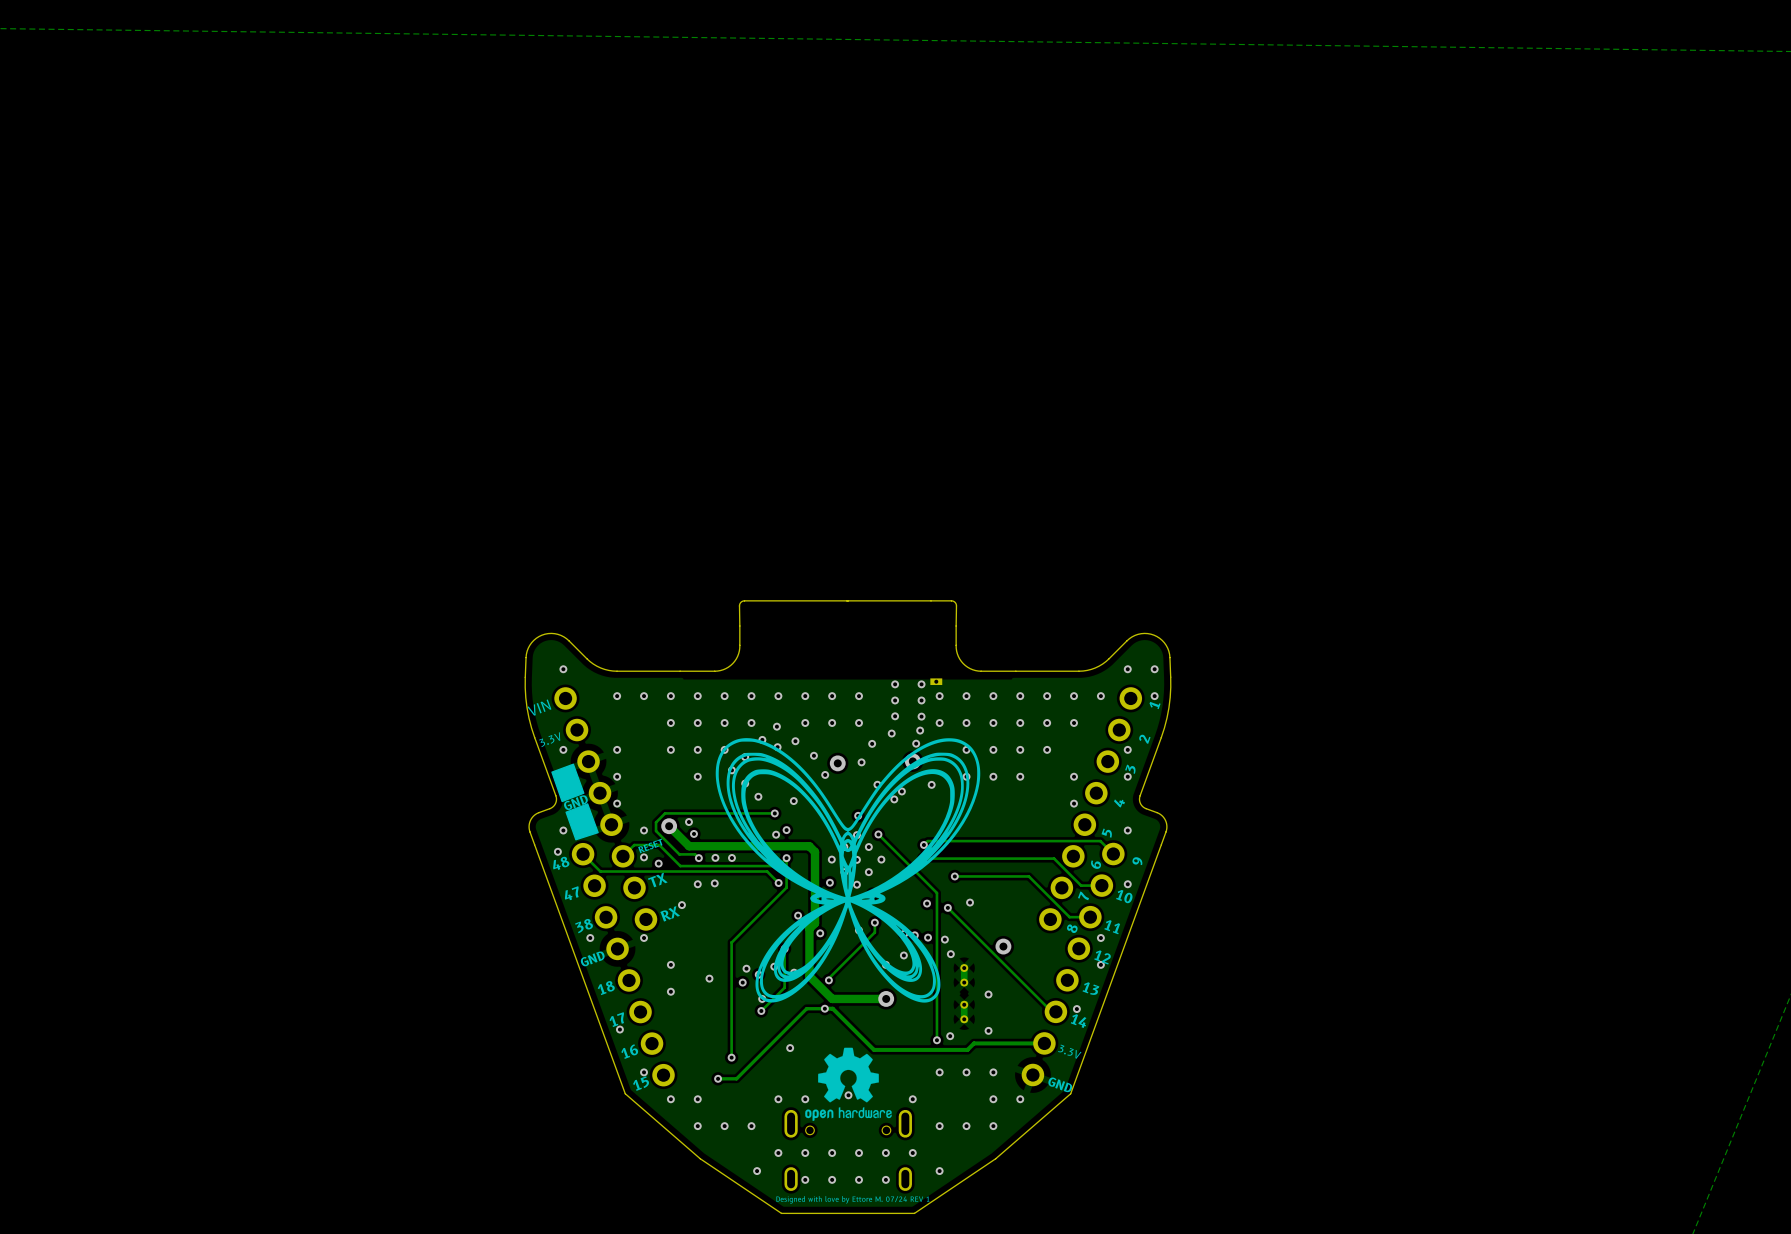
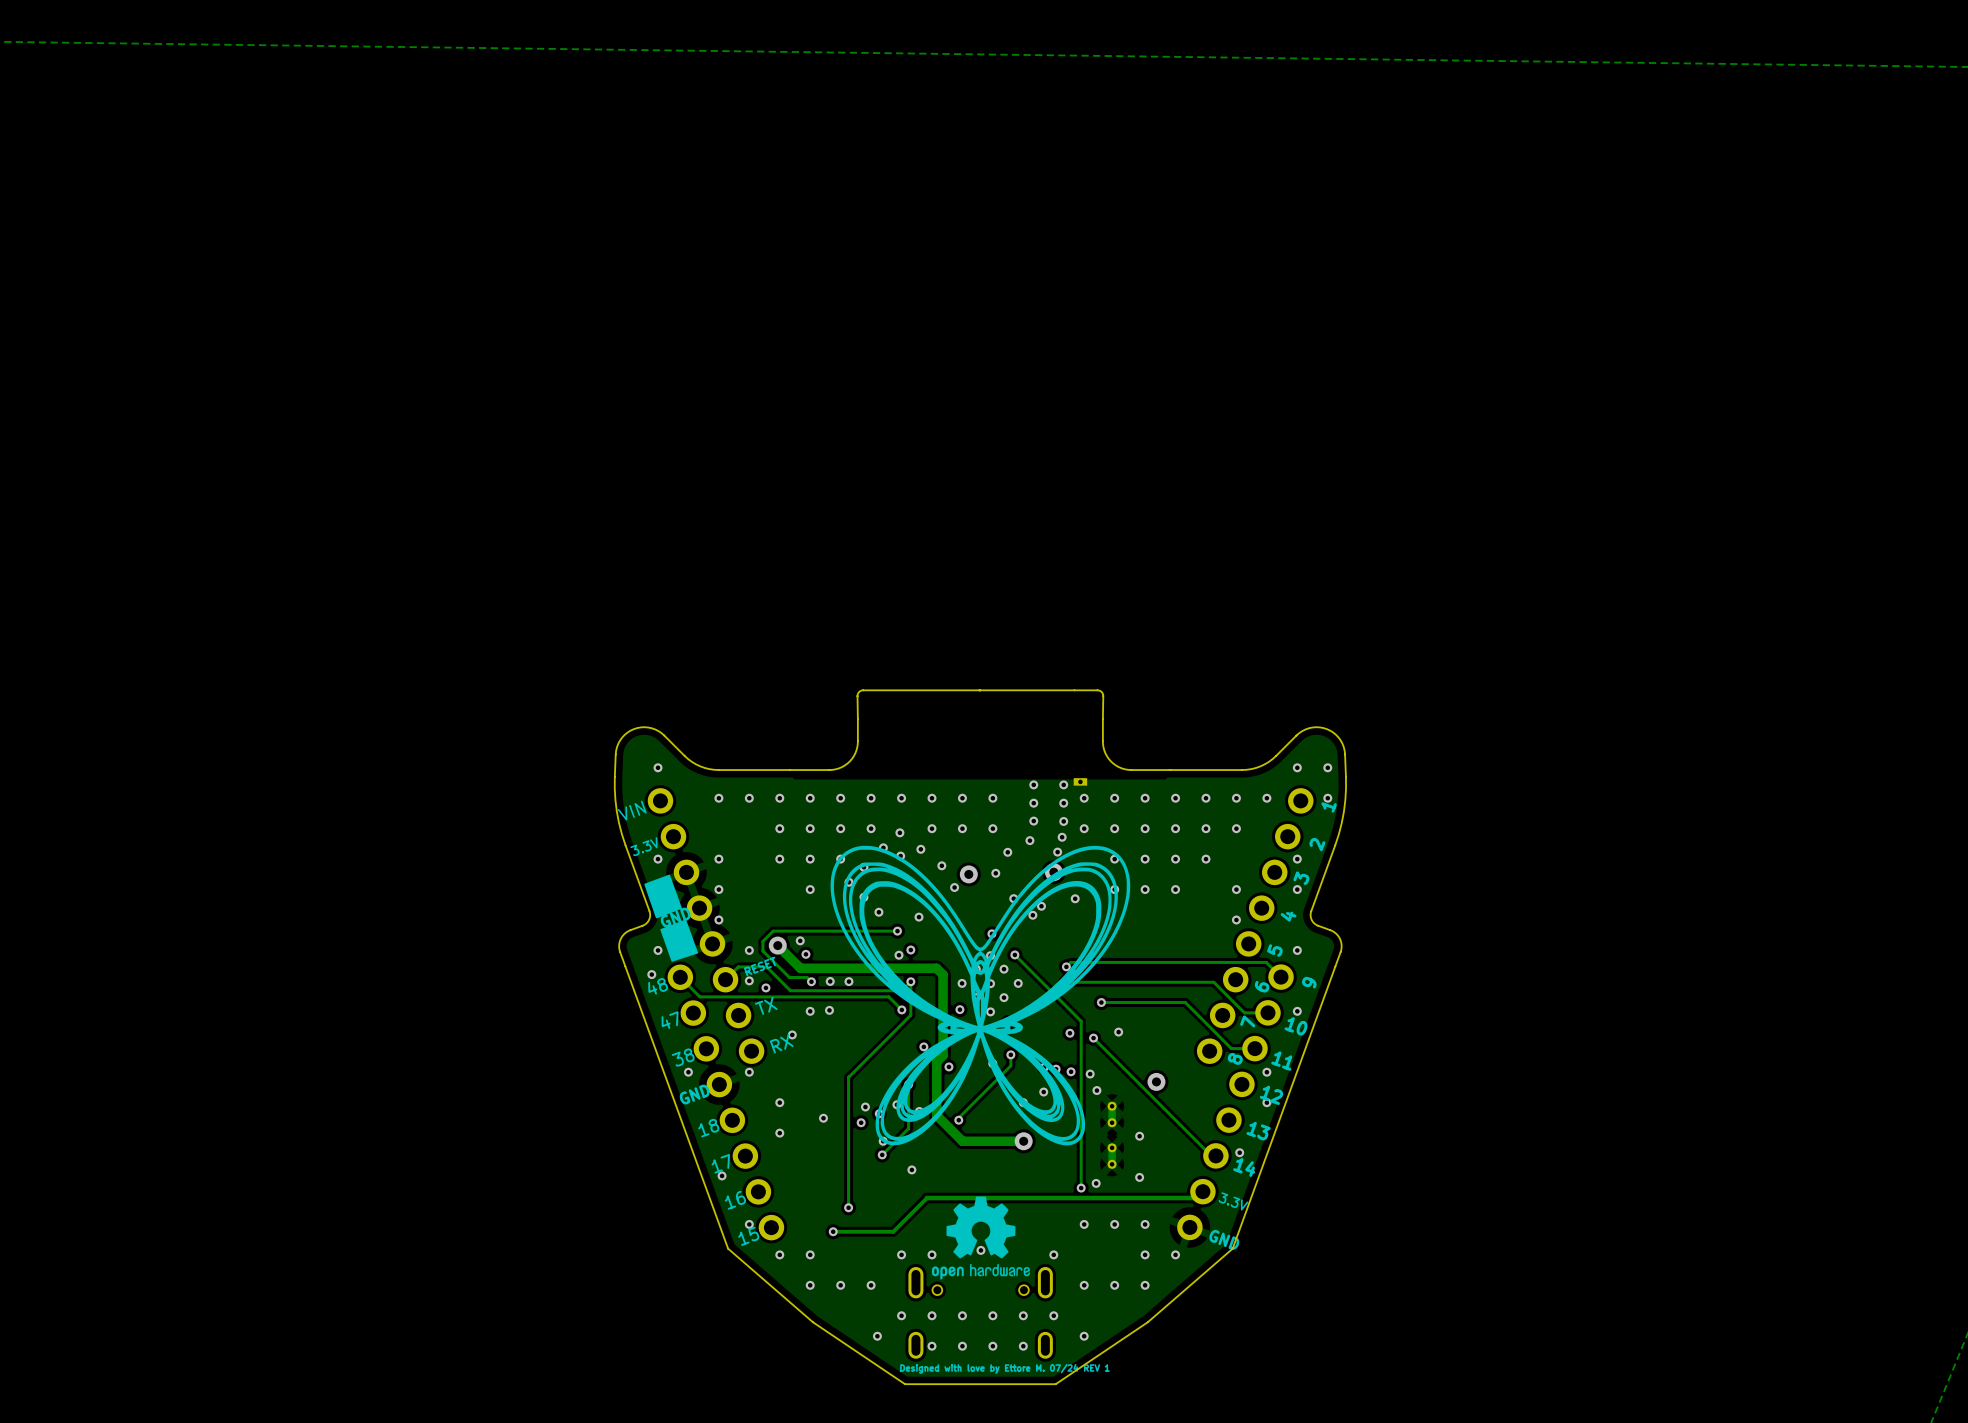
via: (824, 1008) -> none
via: none -> (911, 1169)
track: (1044, 1043) (973, 1043) (967, 1049) (874, 1049) (832, 1008) (806, 1008) (736, 1078) -> (1202, 1191) (1196, 1198) (926, 1198)
via: (790, 1048) -> none
track: none -> (926, 1198) (893, 1231) (854, 1231)

